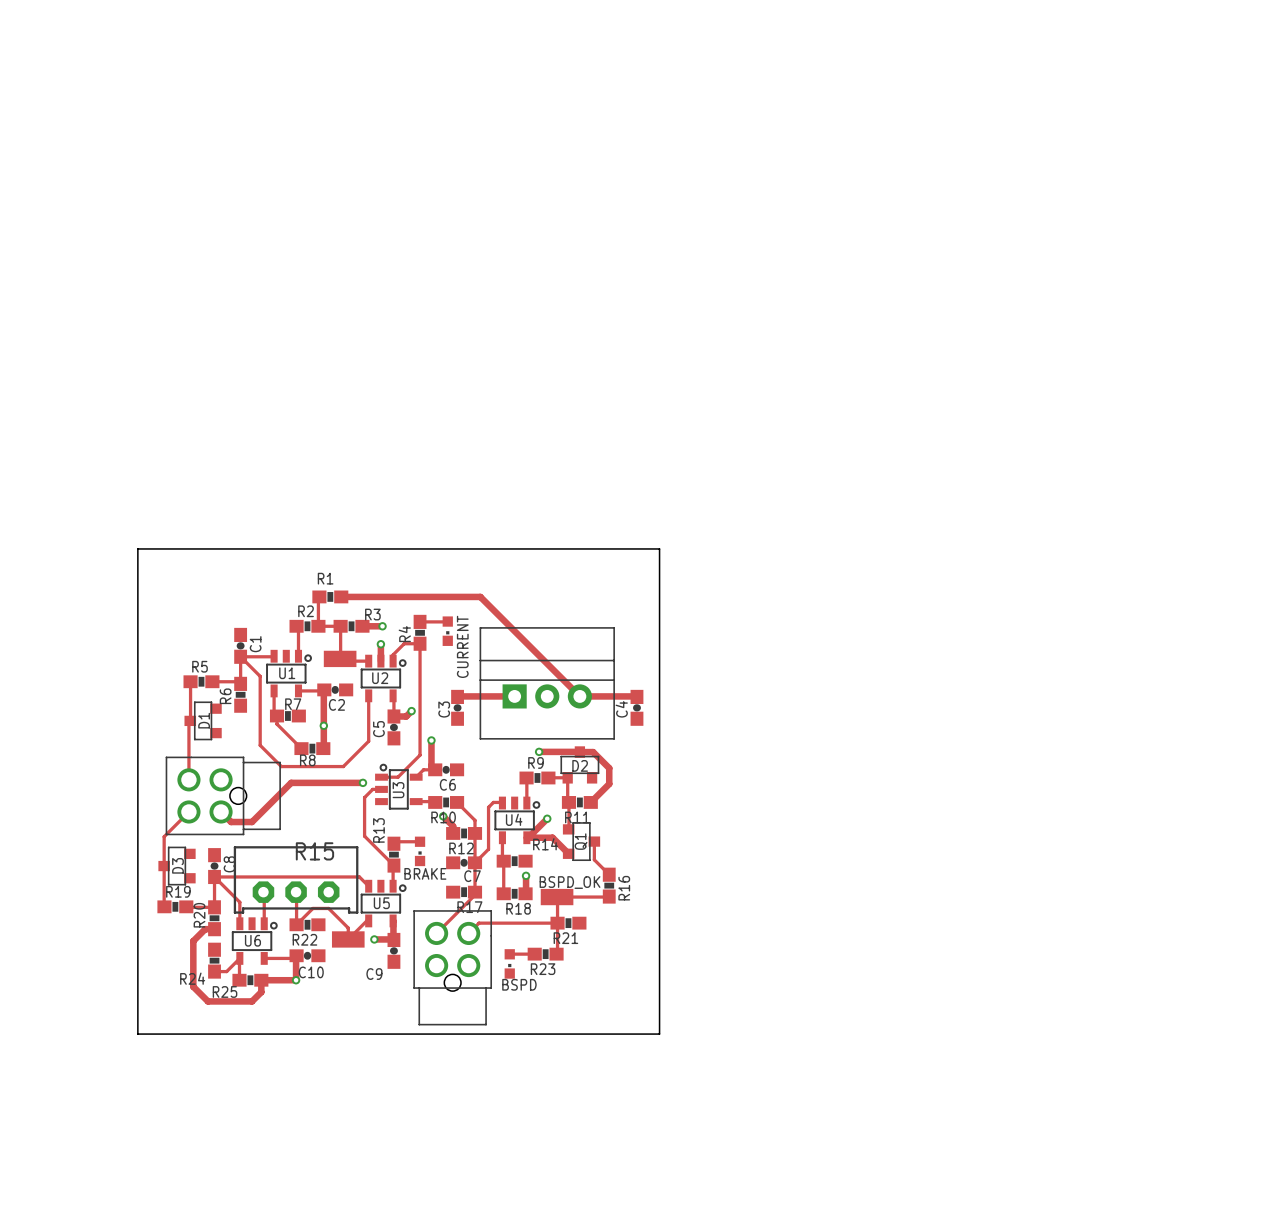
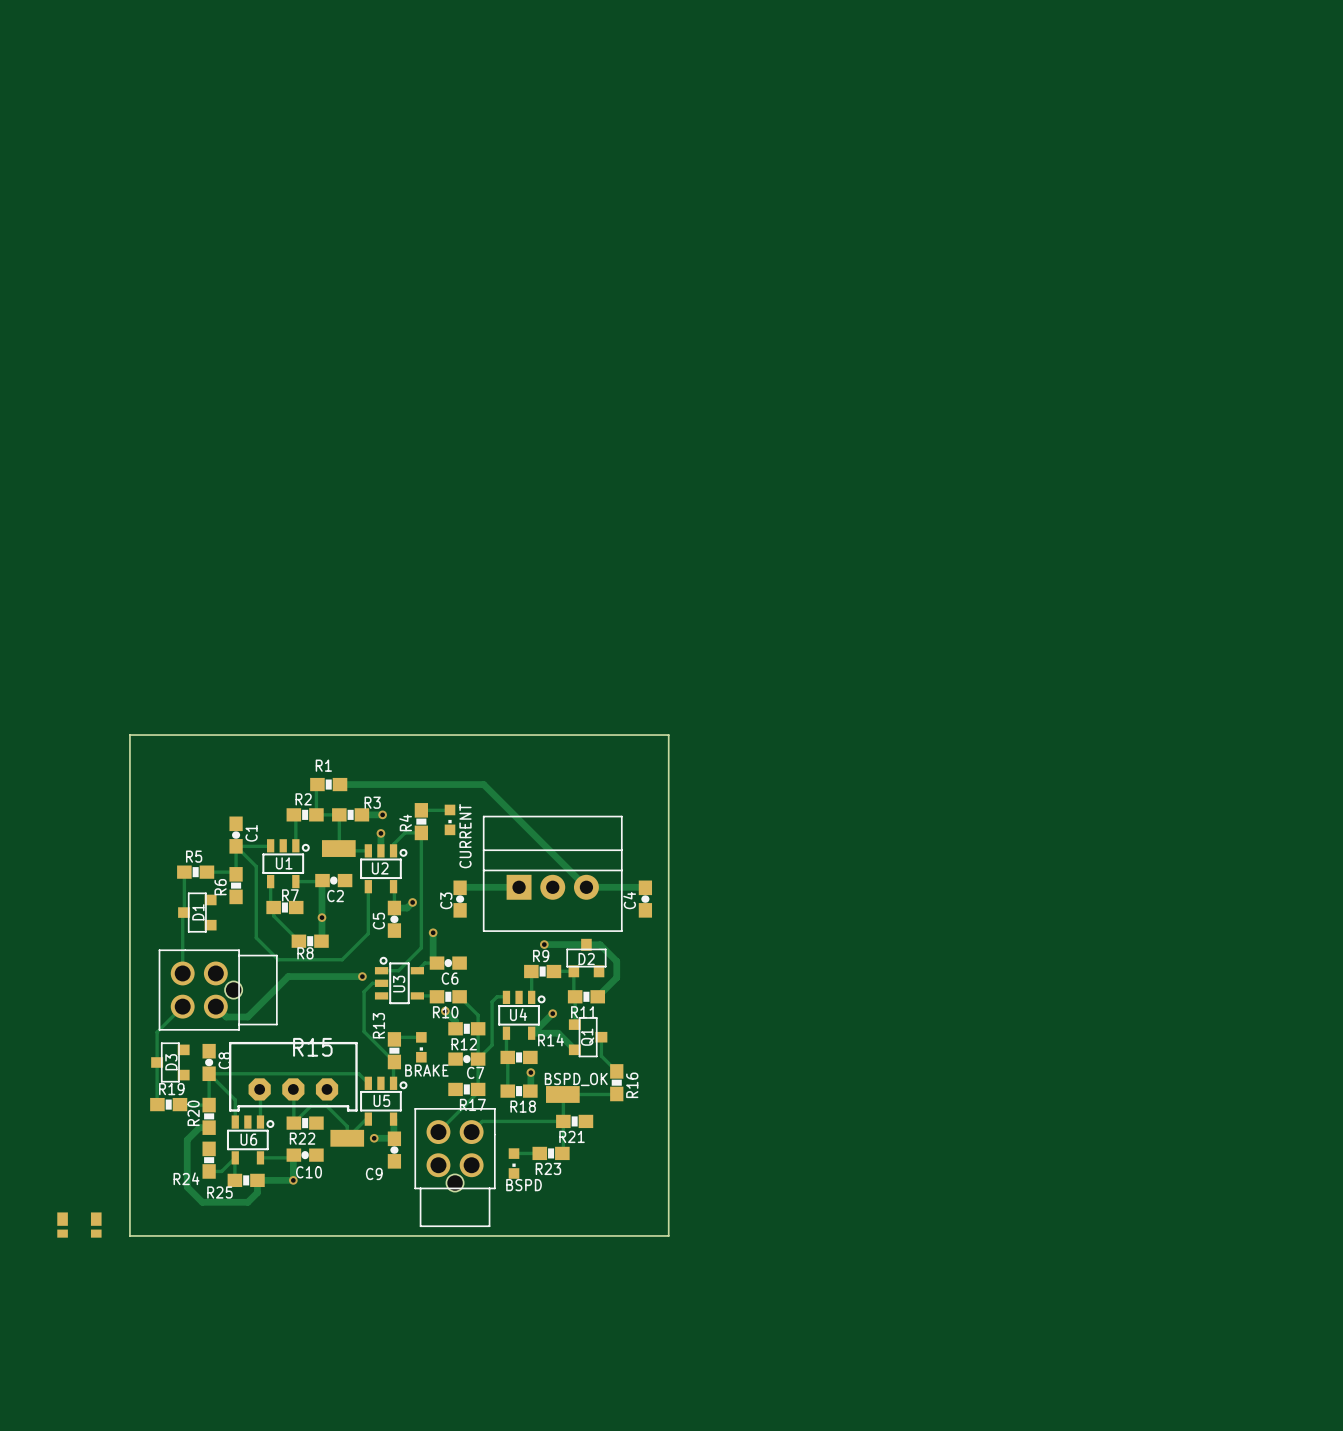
part: none -> (62, 1225)
part: none -> (96, 1225)

